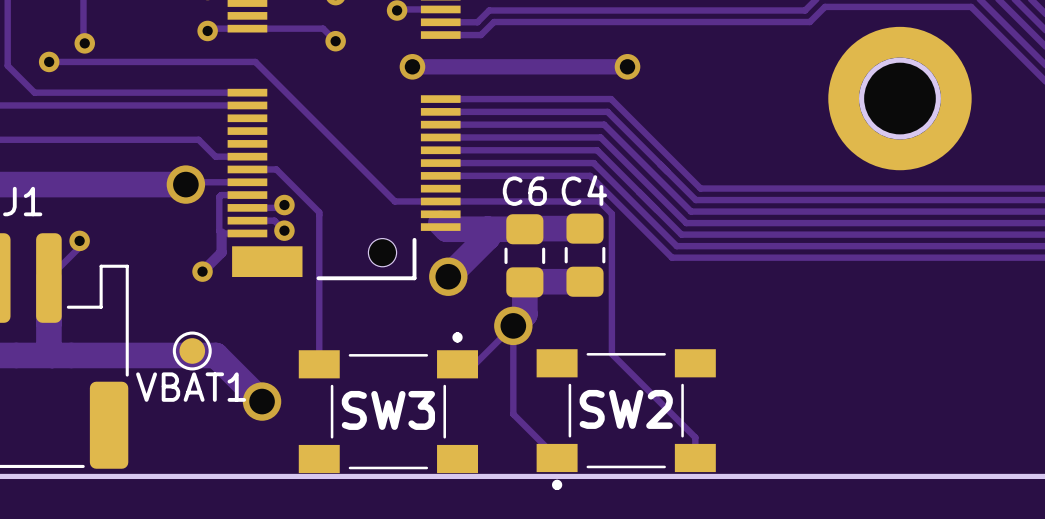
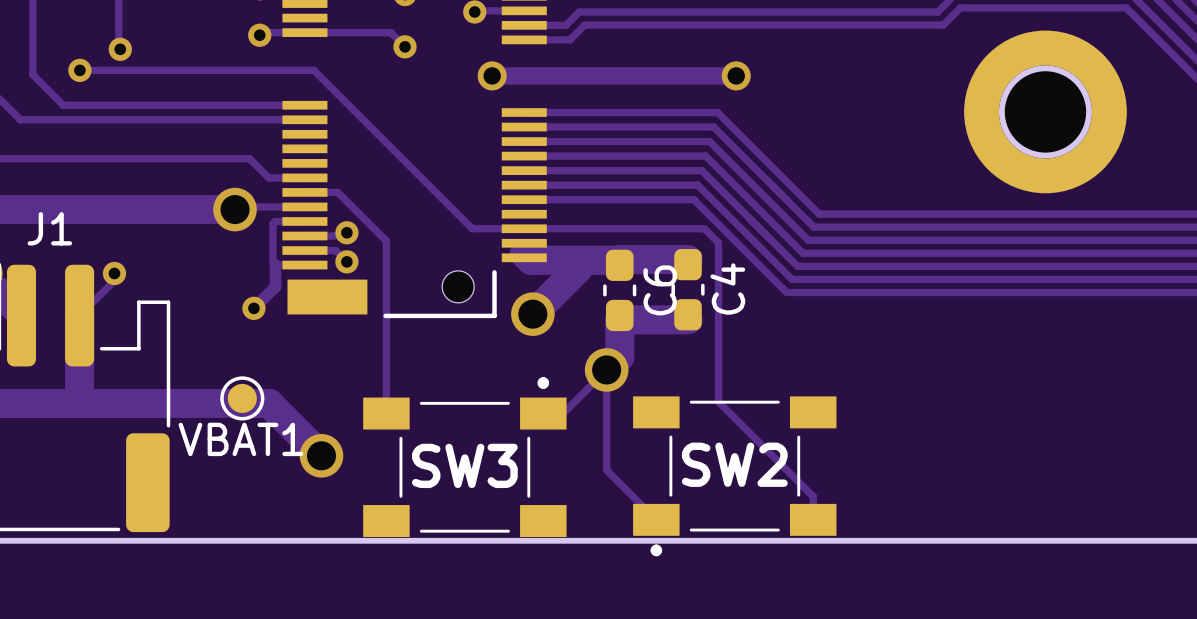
C4 name rotation: 0° (584, 190) -> 90° counterclockwise (727, 288)
C4 name position: C4 (584, 190) -> C4 (727, 288)
C6 name rotation: 0° (524, 191) -> 90° counterclockwise (660, 290)
C6 name position: C6 (524, 191) -> C6 (660, 290)
C4 footprint: [564, 213, 606, 297] -> [671, 249, 705, 331]
C6 footprint: [504, 214, 546, 298] -> [603, 249, 637, 332]

